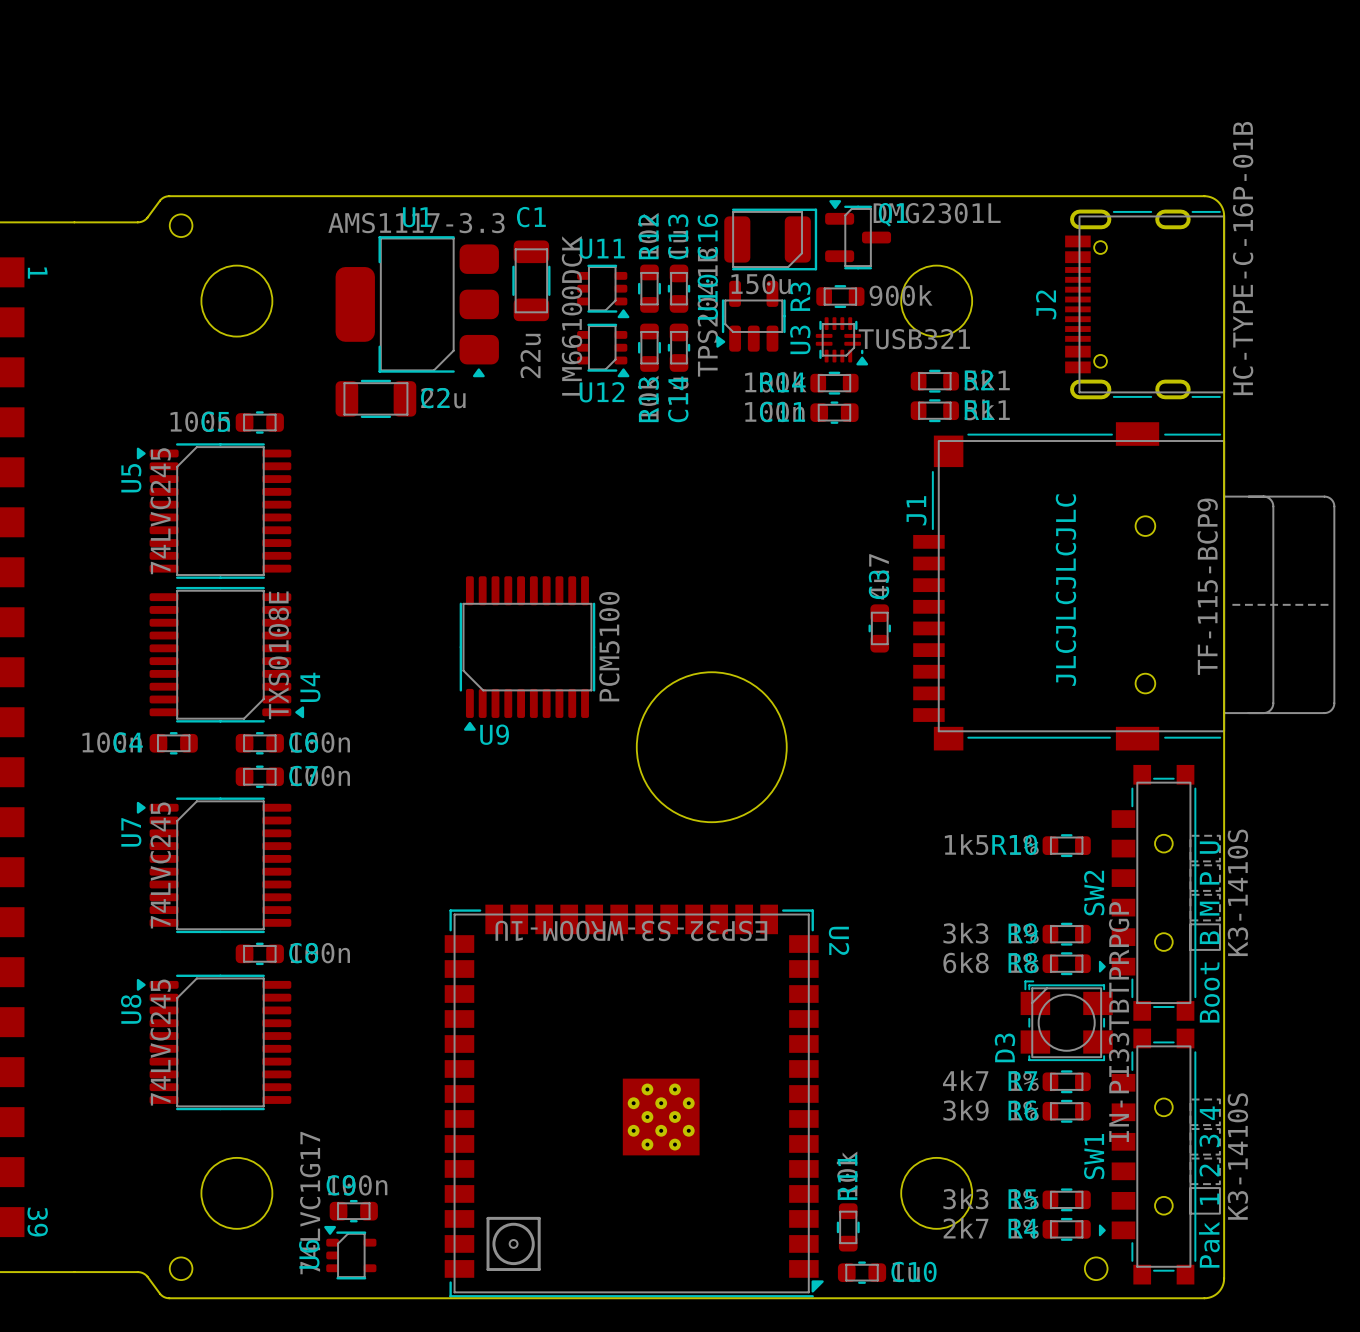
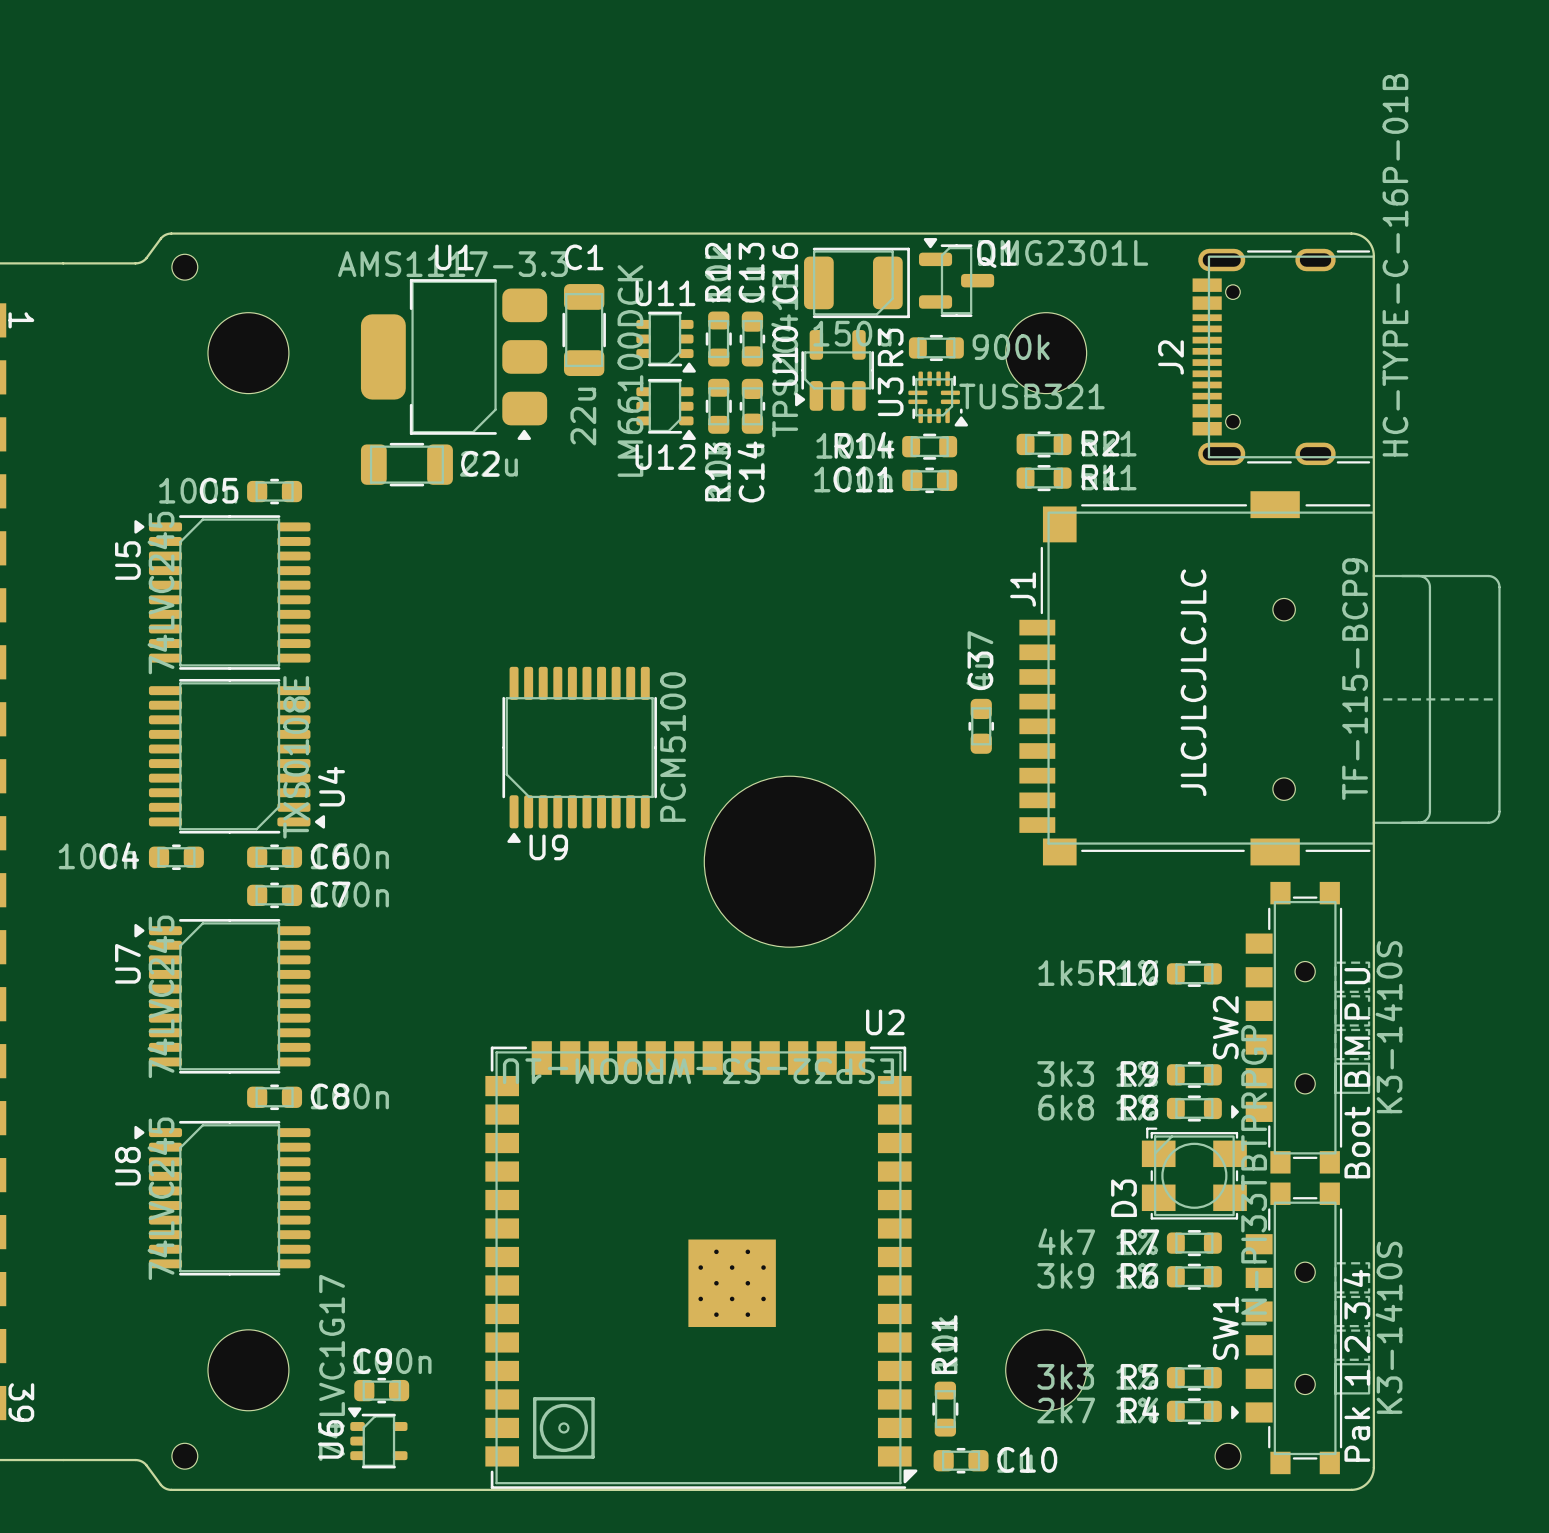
U2 name rotation: 0° (839, 940) -> 90° counterclockwise (885, 1022)
U2 name position: U2 (839, 940) -> U2 (885, 1022)

